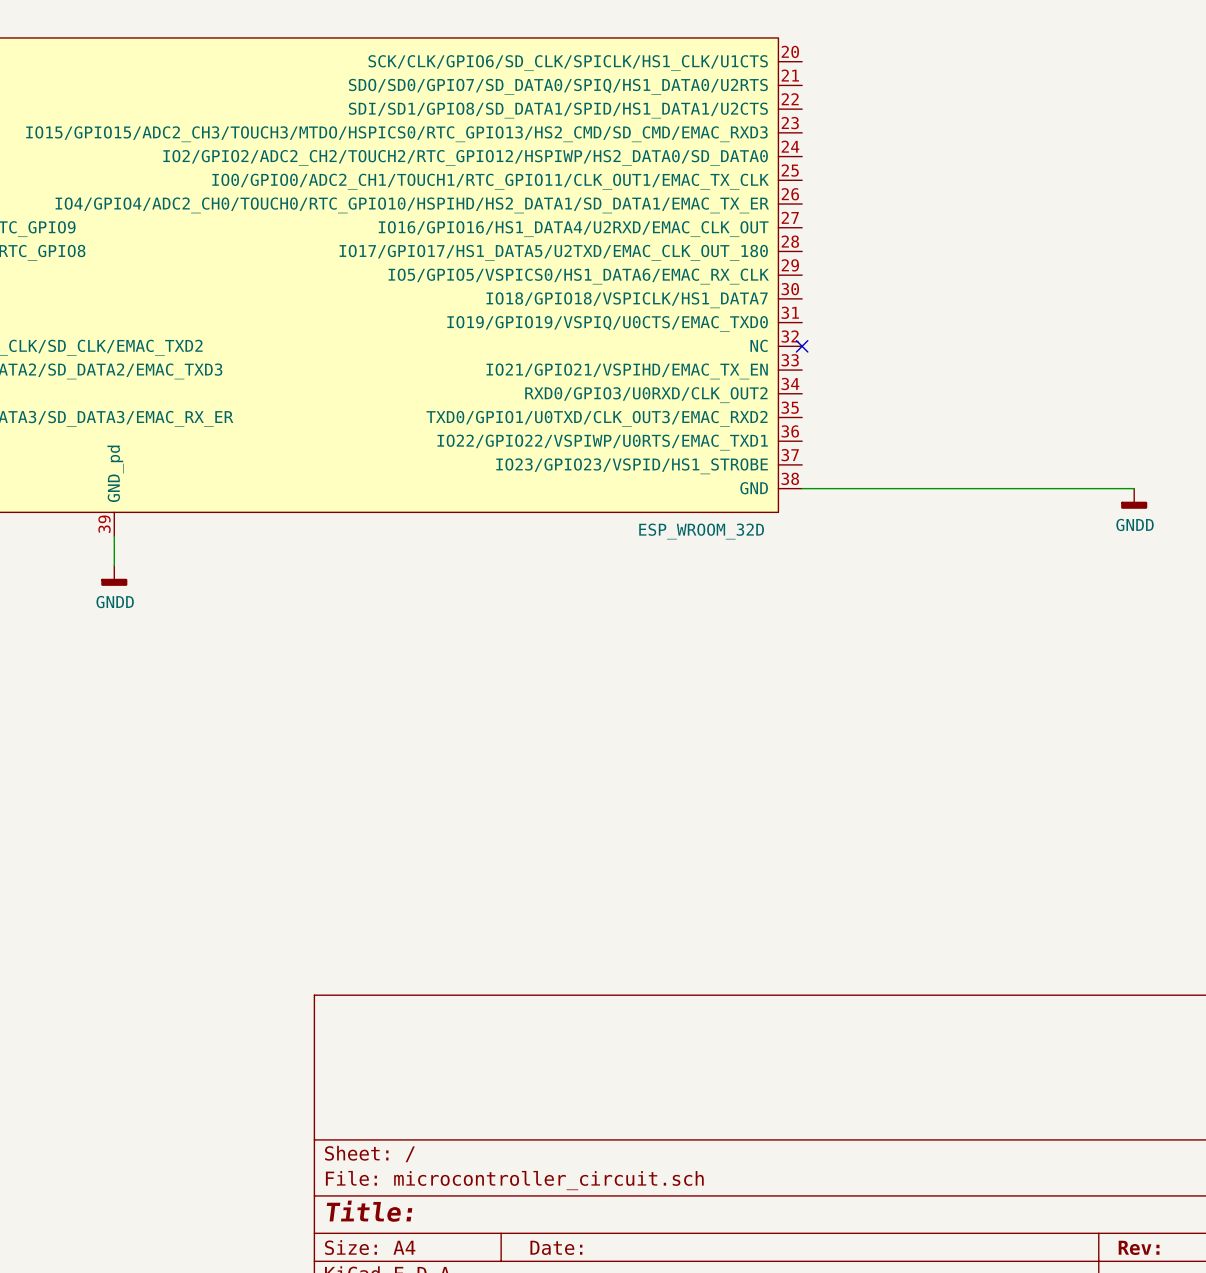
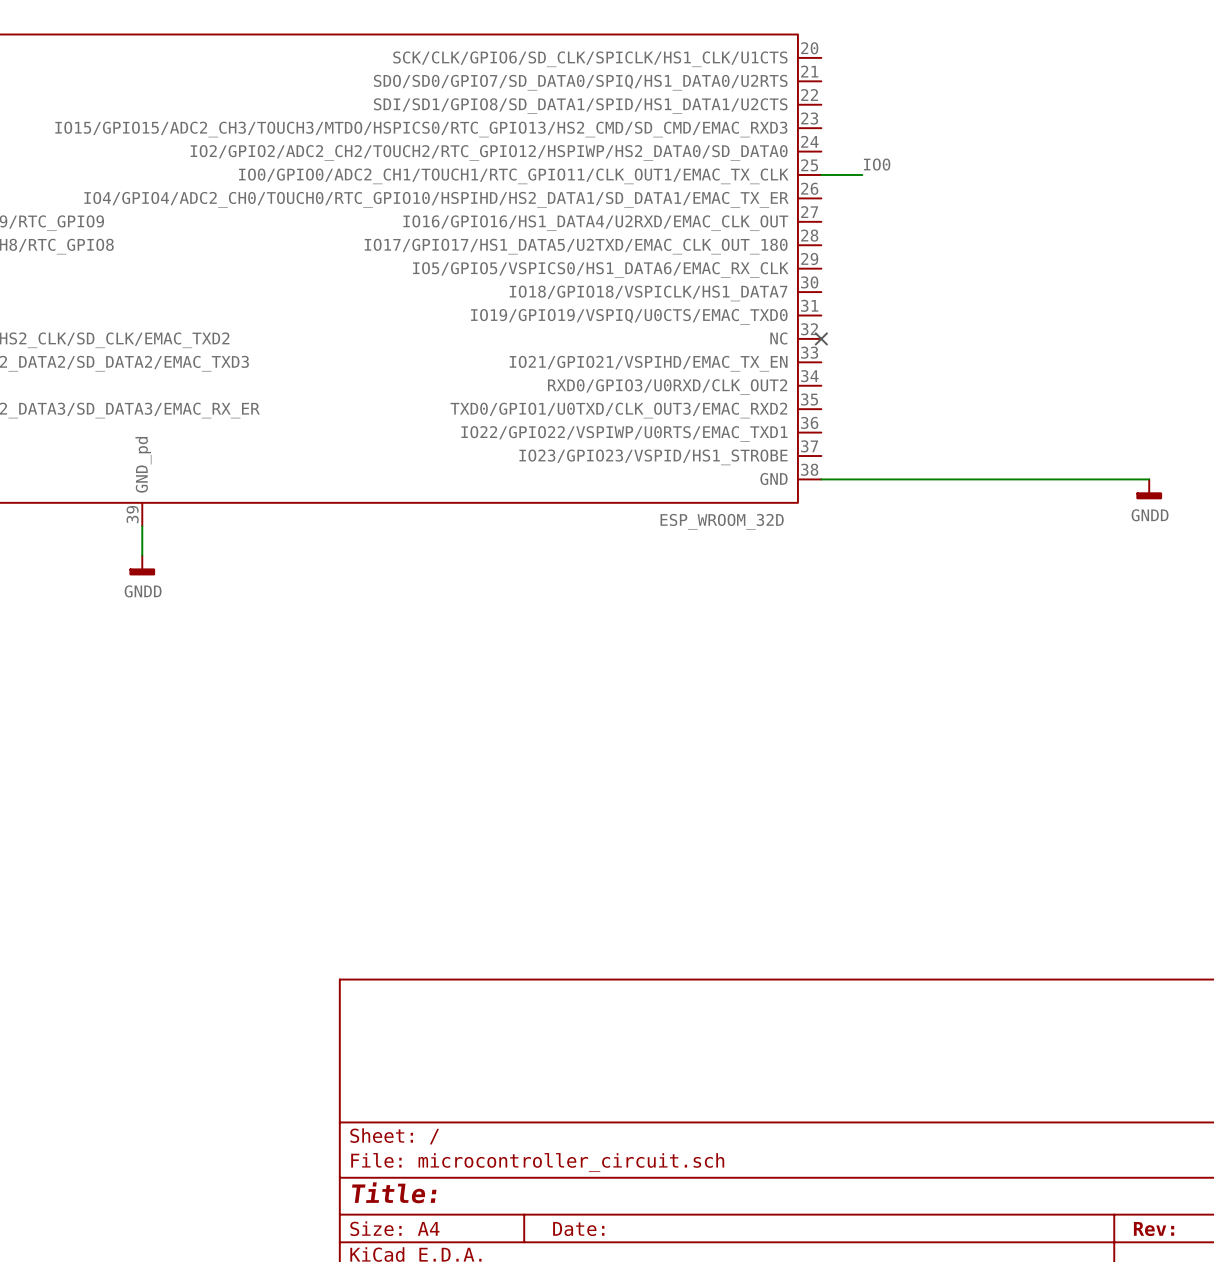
label: none -> IO0 (877, 164)
wire: none -> (821, 175) (862, 175)

